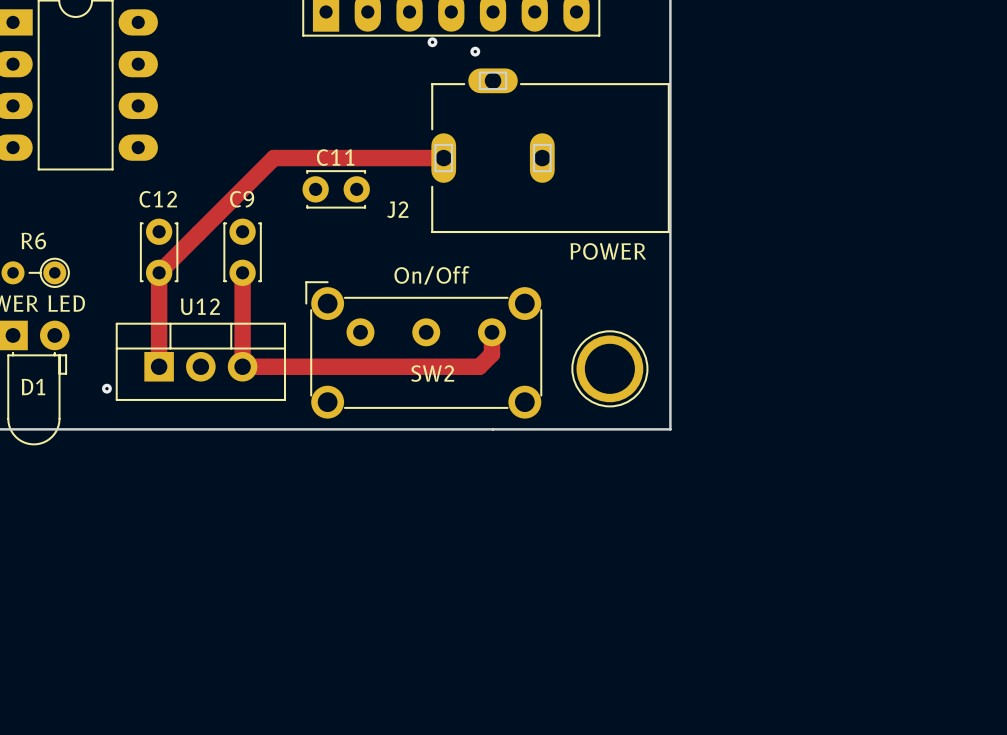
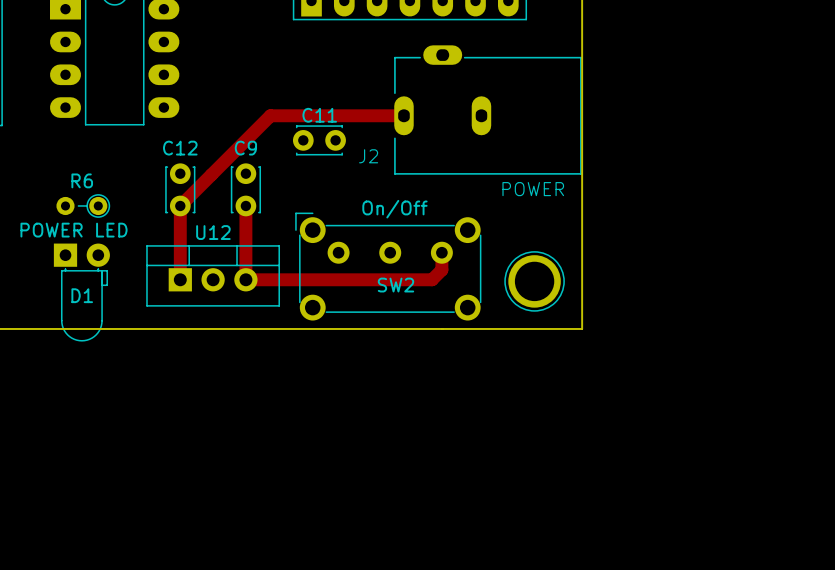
via: (432, 42) -> none
via: (475, 51) -> none
via: (106, 388) -> none

